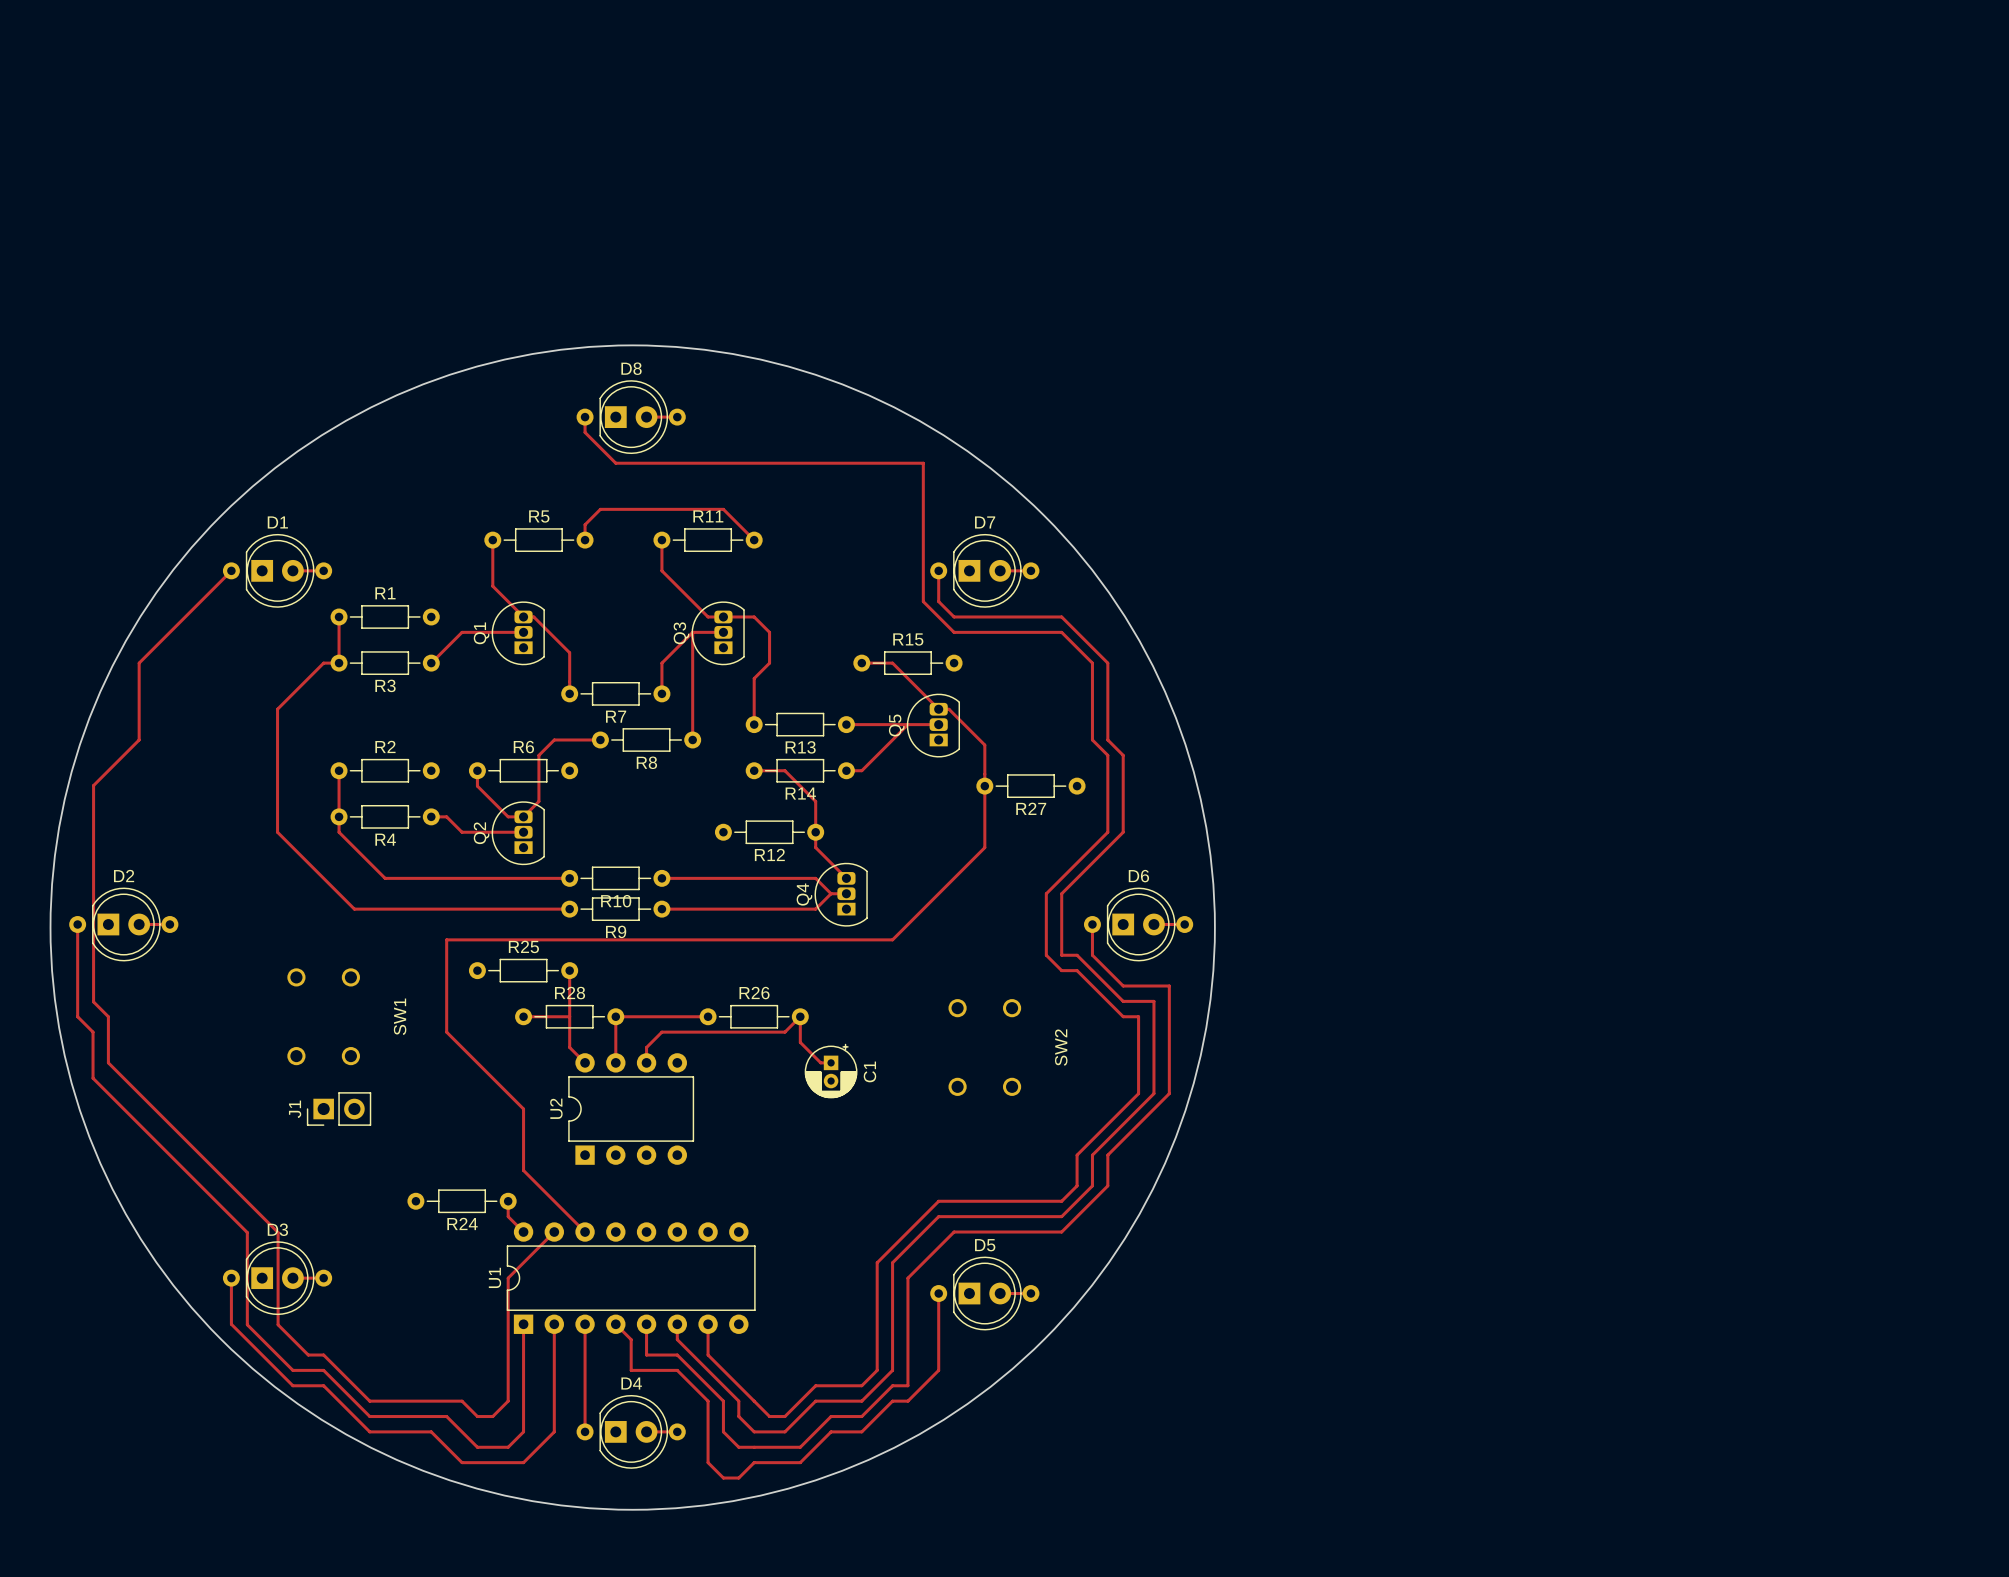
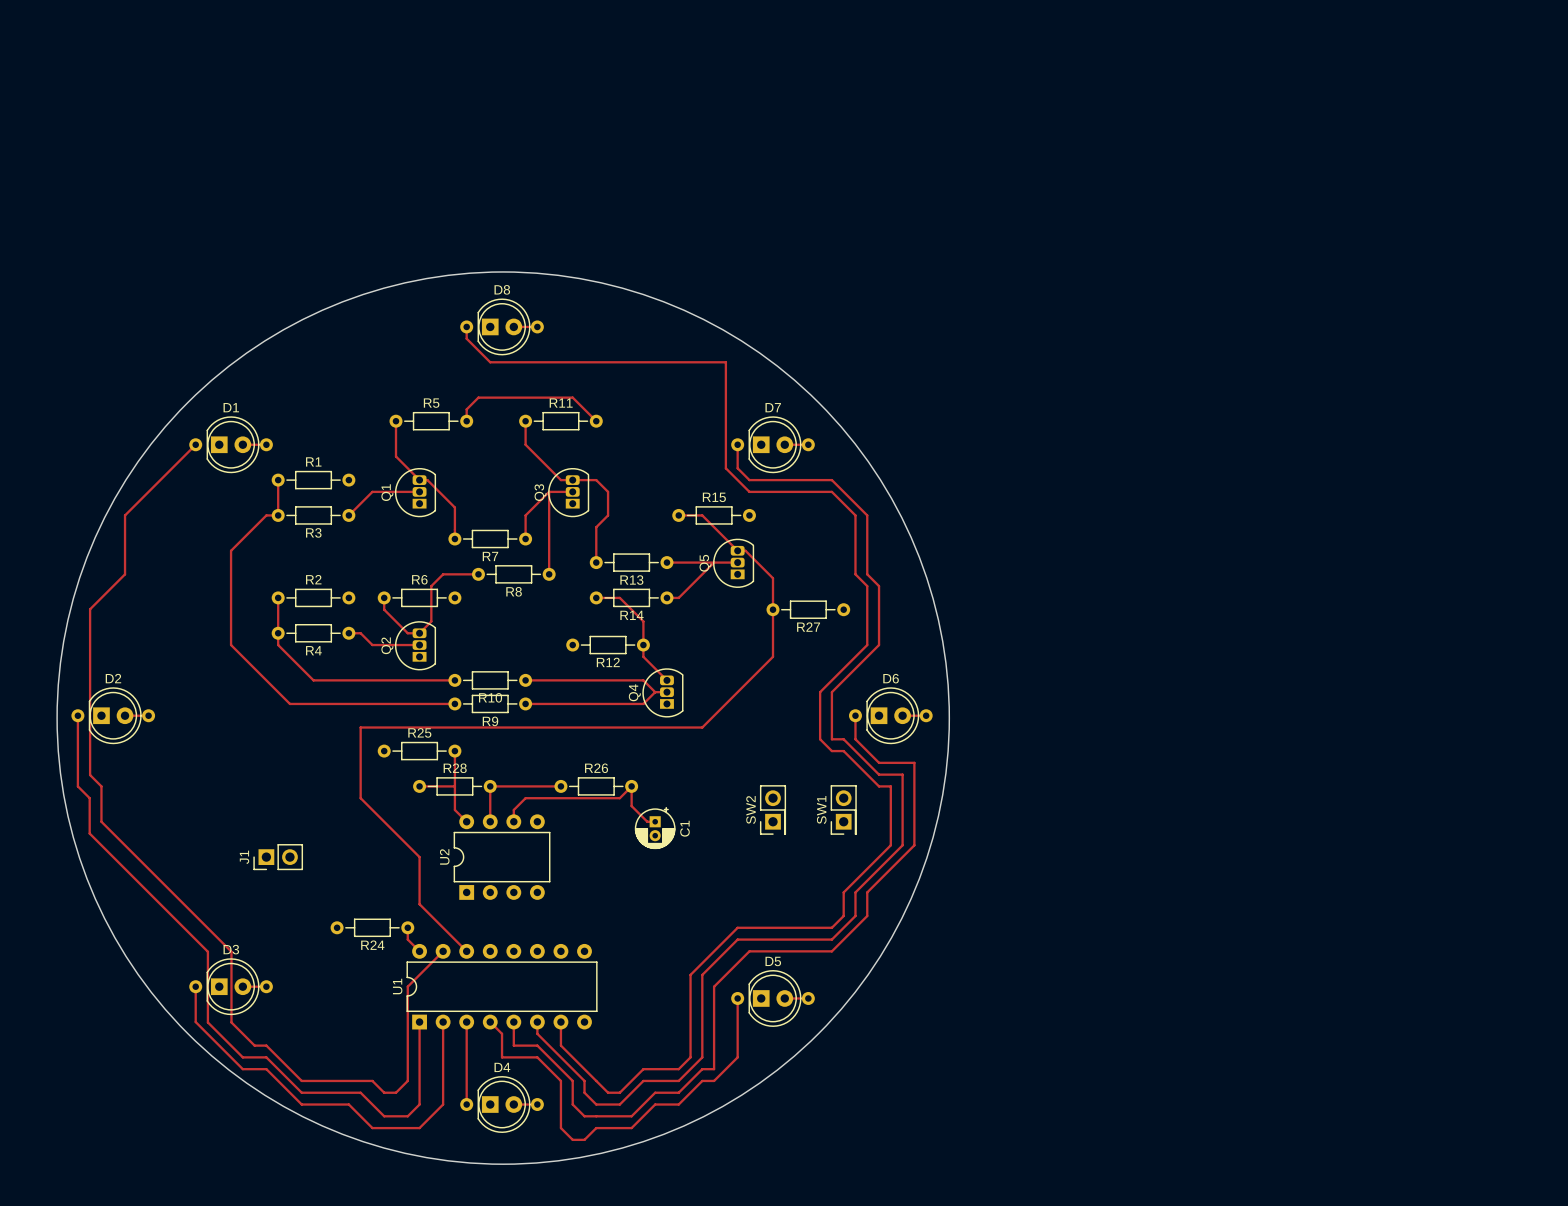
SW1 footprint: [287, 968, 360, 1066] -> [830, 785, 857, 835]
SW2 footprint: [948, 999, 1022, 1096] -> [760, 785, 786, 835]
SW1 name position: SW1 (400, 1016) -> SW1 (821, 810)
SW2 name position: SW2 (1061, 1047) -> SW2 (751, 810)

